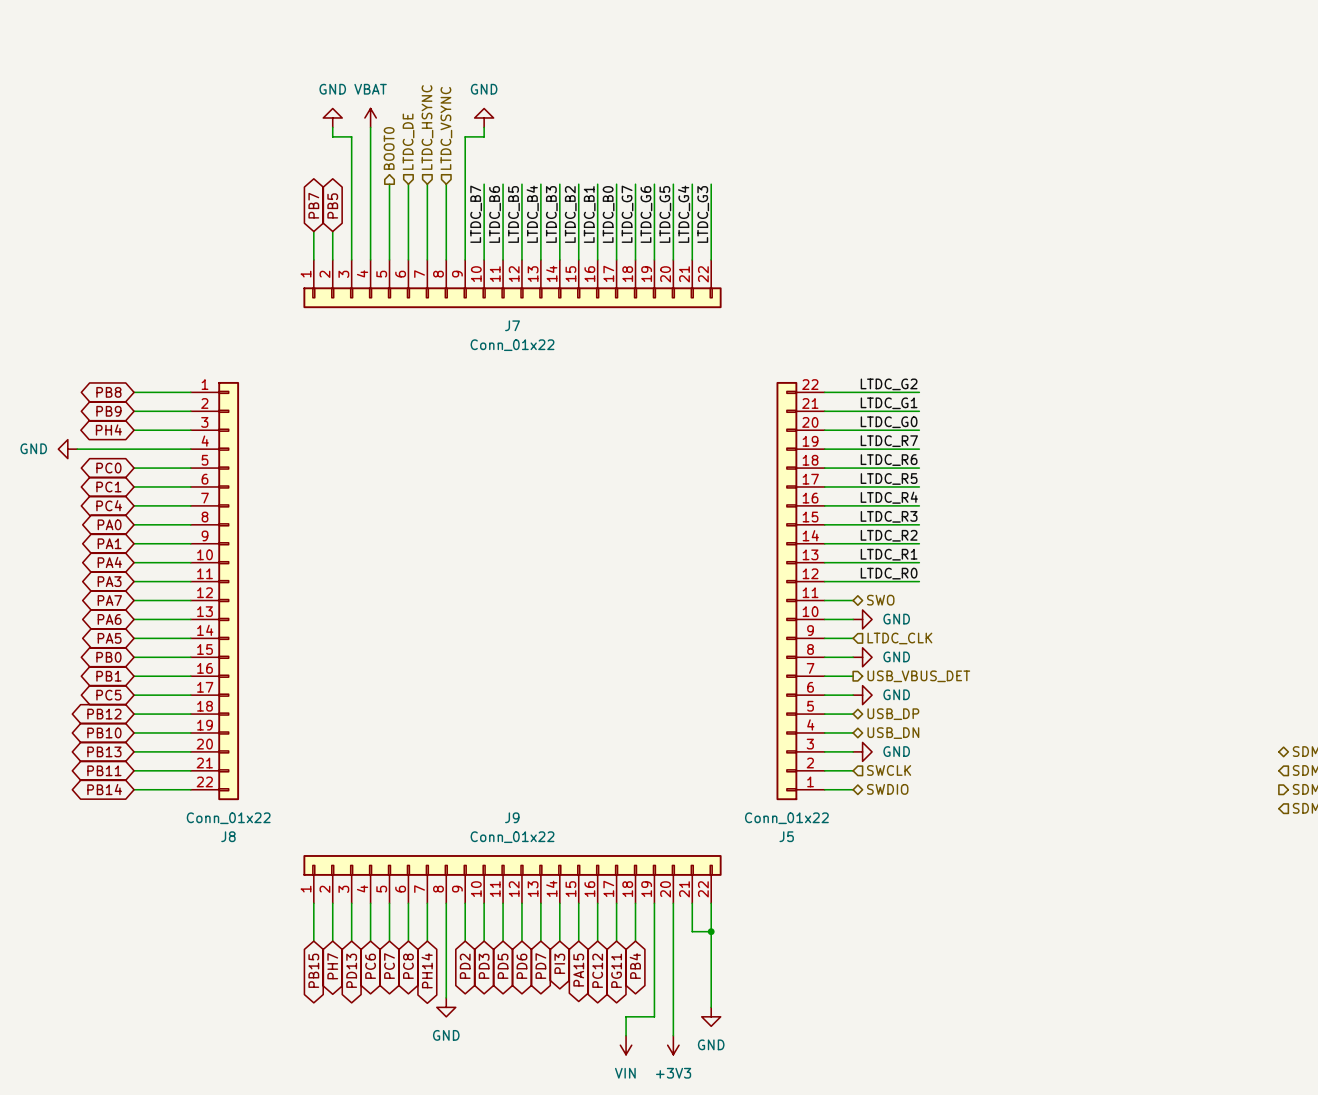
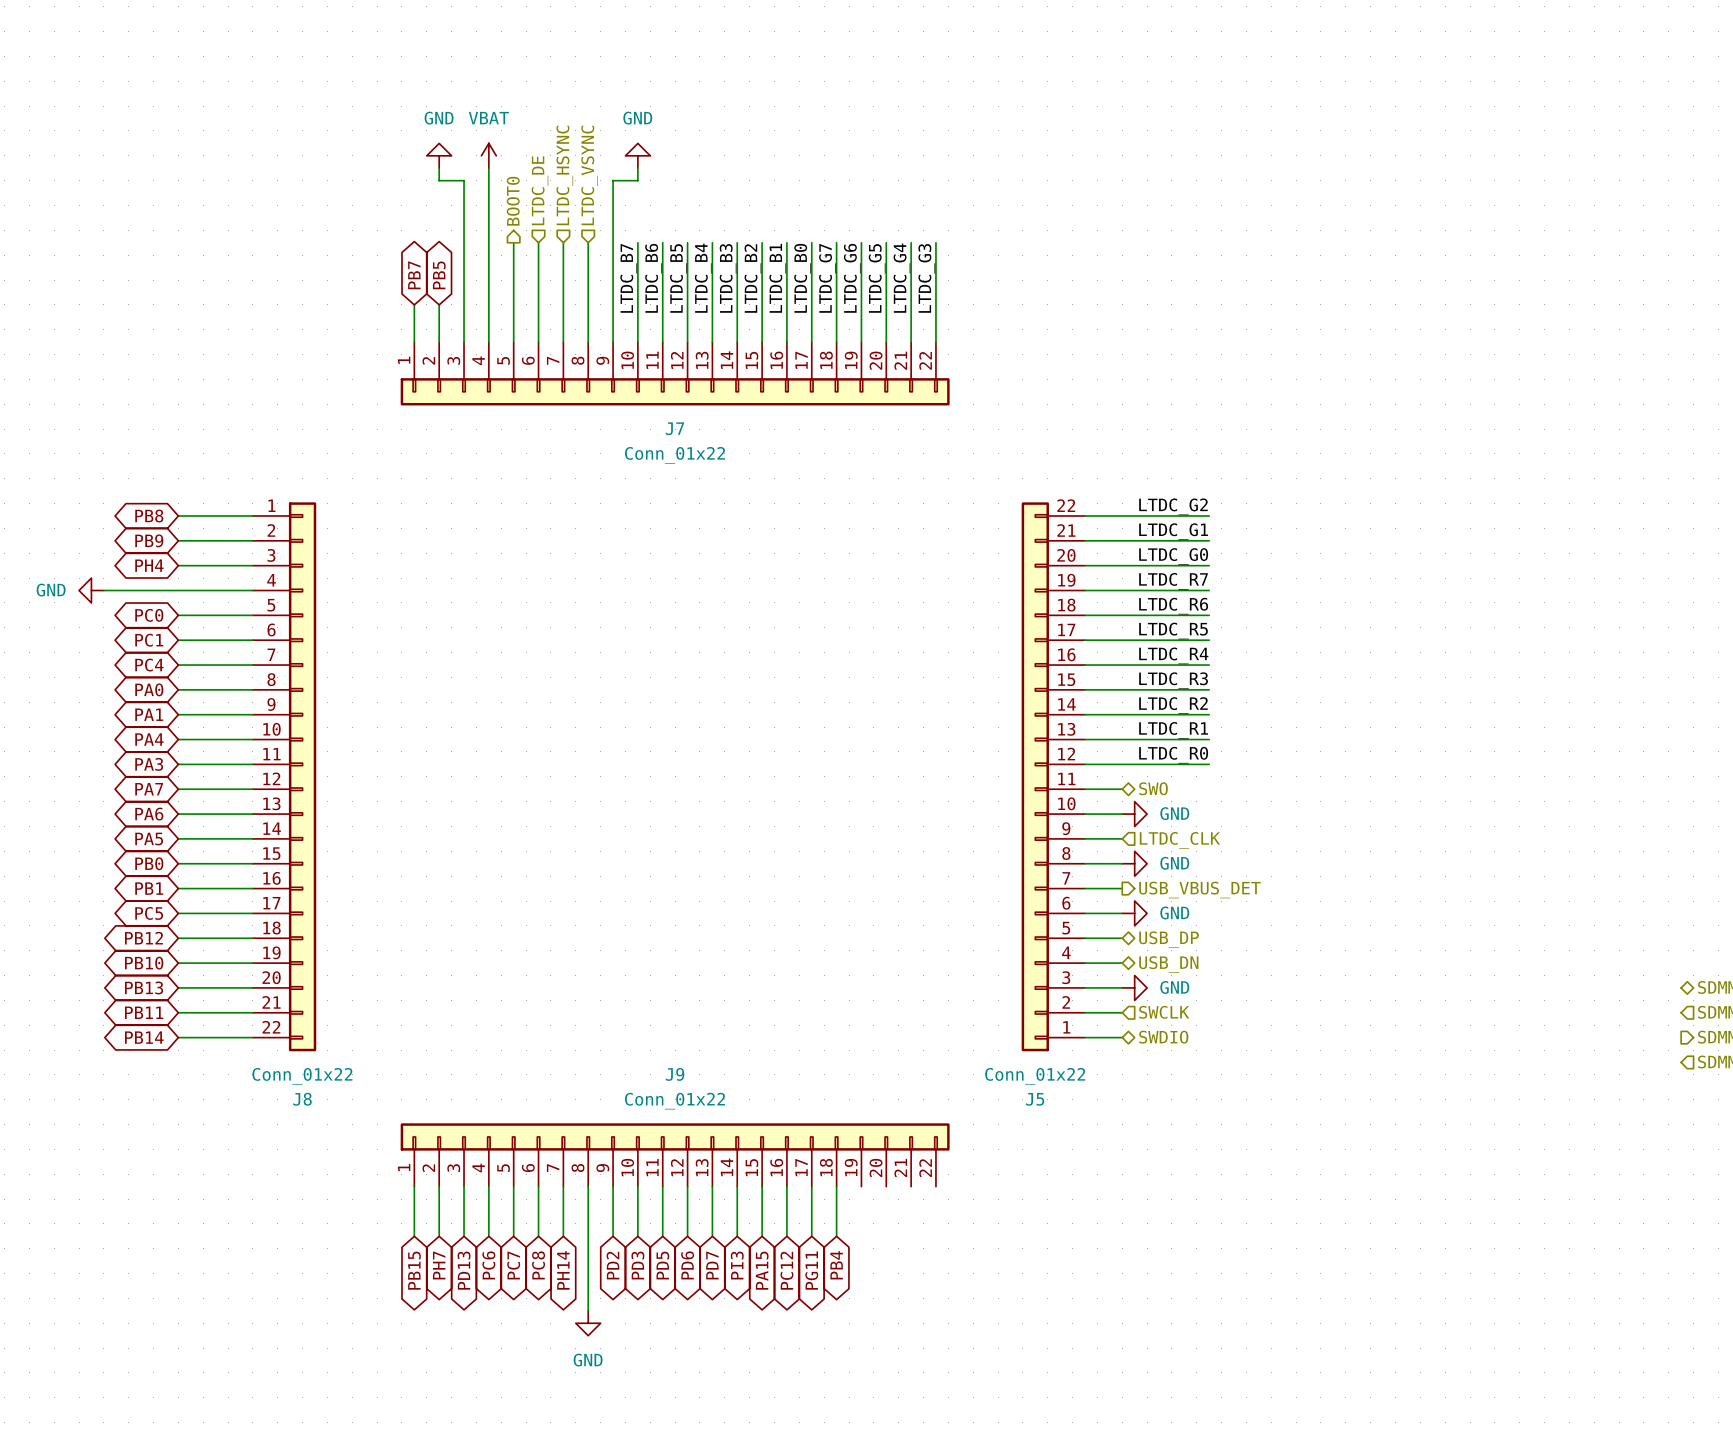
wire: (654, 903) (654, 1016) (626, 1016) (626, 1035) -> none
wire: (673, 903) (673, 1035) -> none
wire: (692, 903) (692, 931) (711, 931) -> none
wire: (711, 903) (711, 1007) -> none
junction: (711, 931) -> none
power symbol: GND (711, 1016) -> none
power symbol: VIN (626, 1045) -> none
power symbol: +3V3 (673, 1045) -> none

